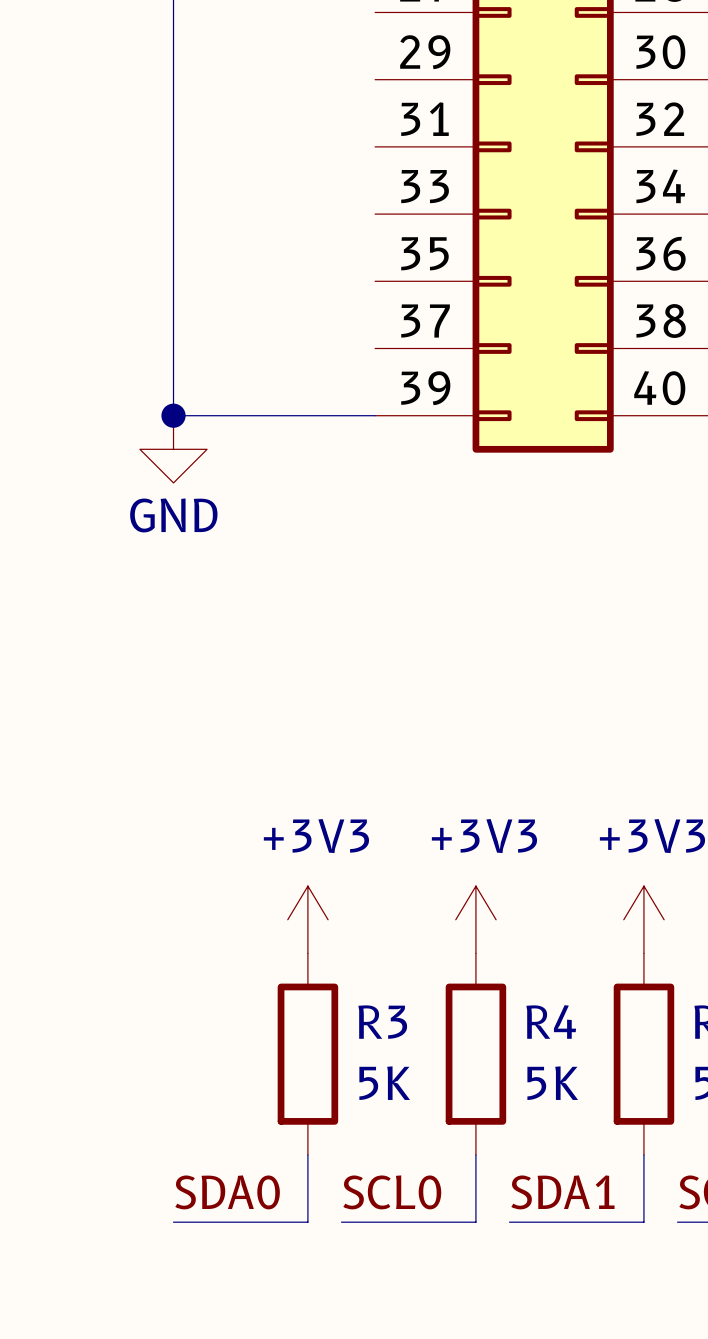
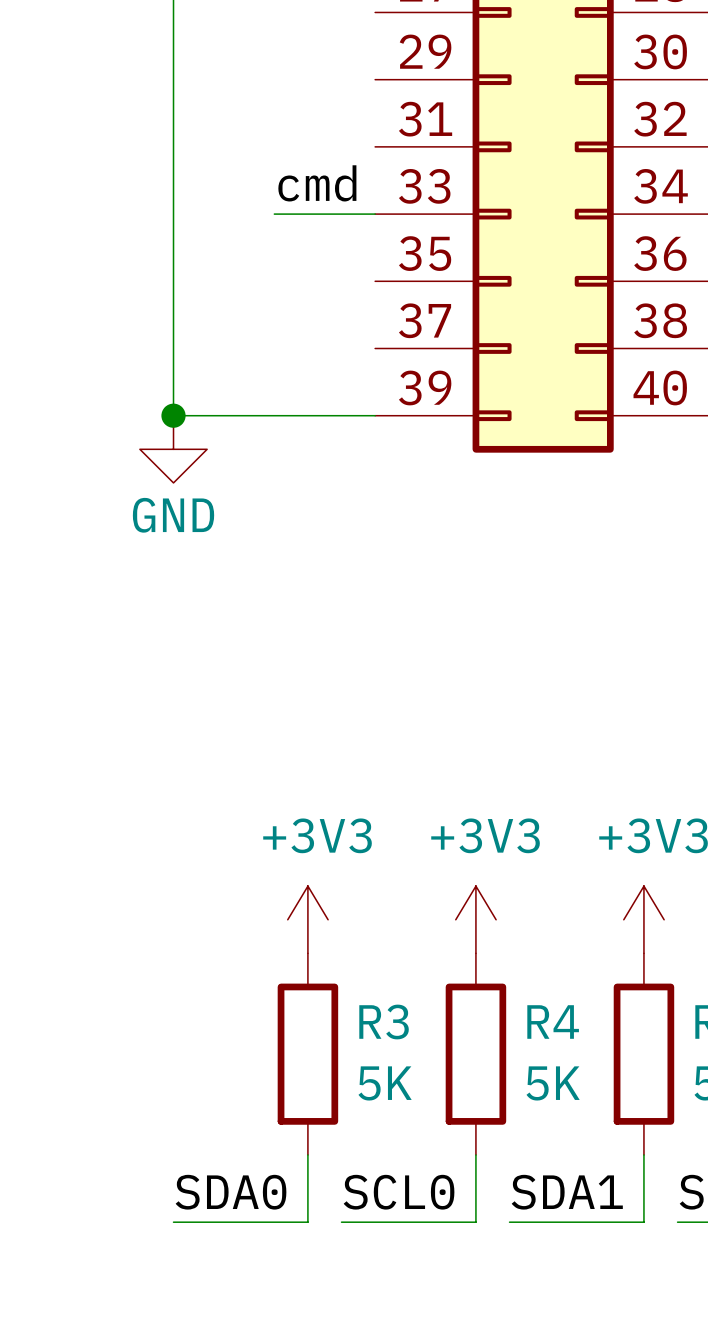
label: none -> cmd (317, 183)
wire: none -> (274, 214) (375, 214)

